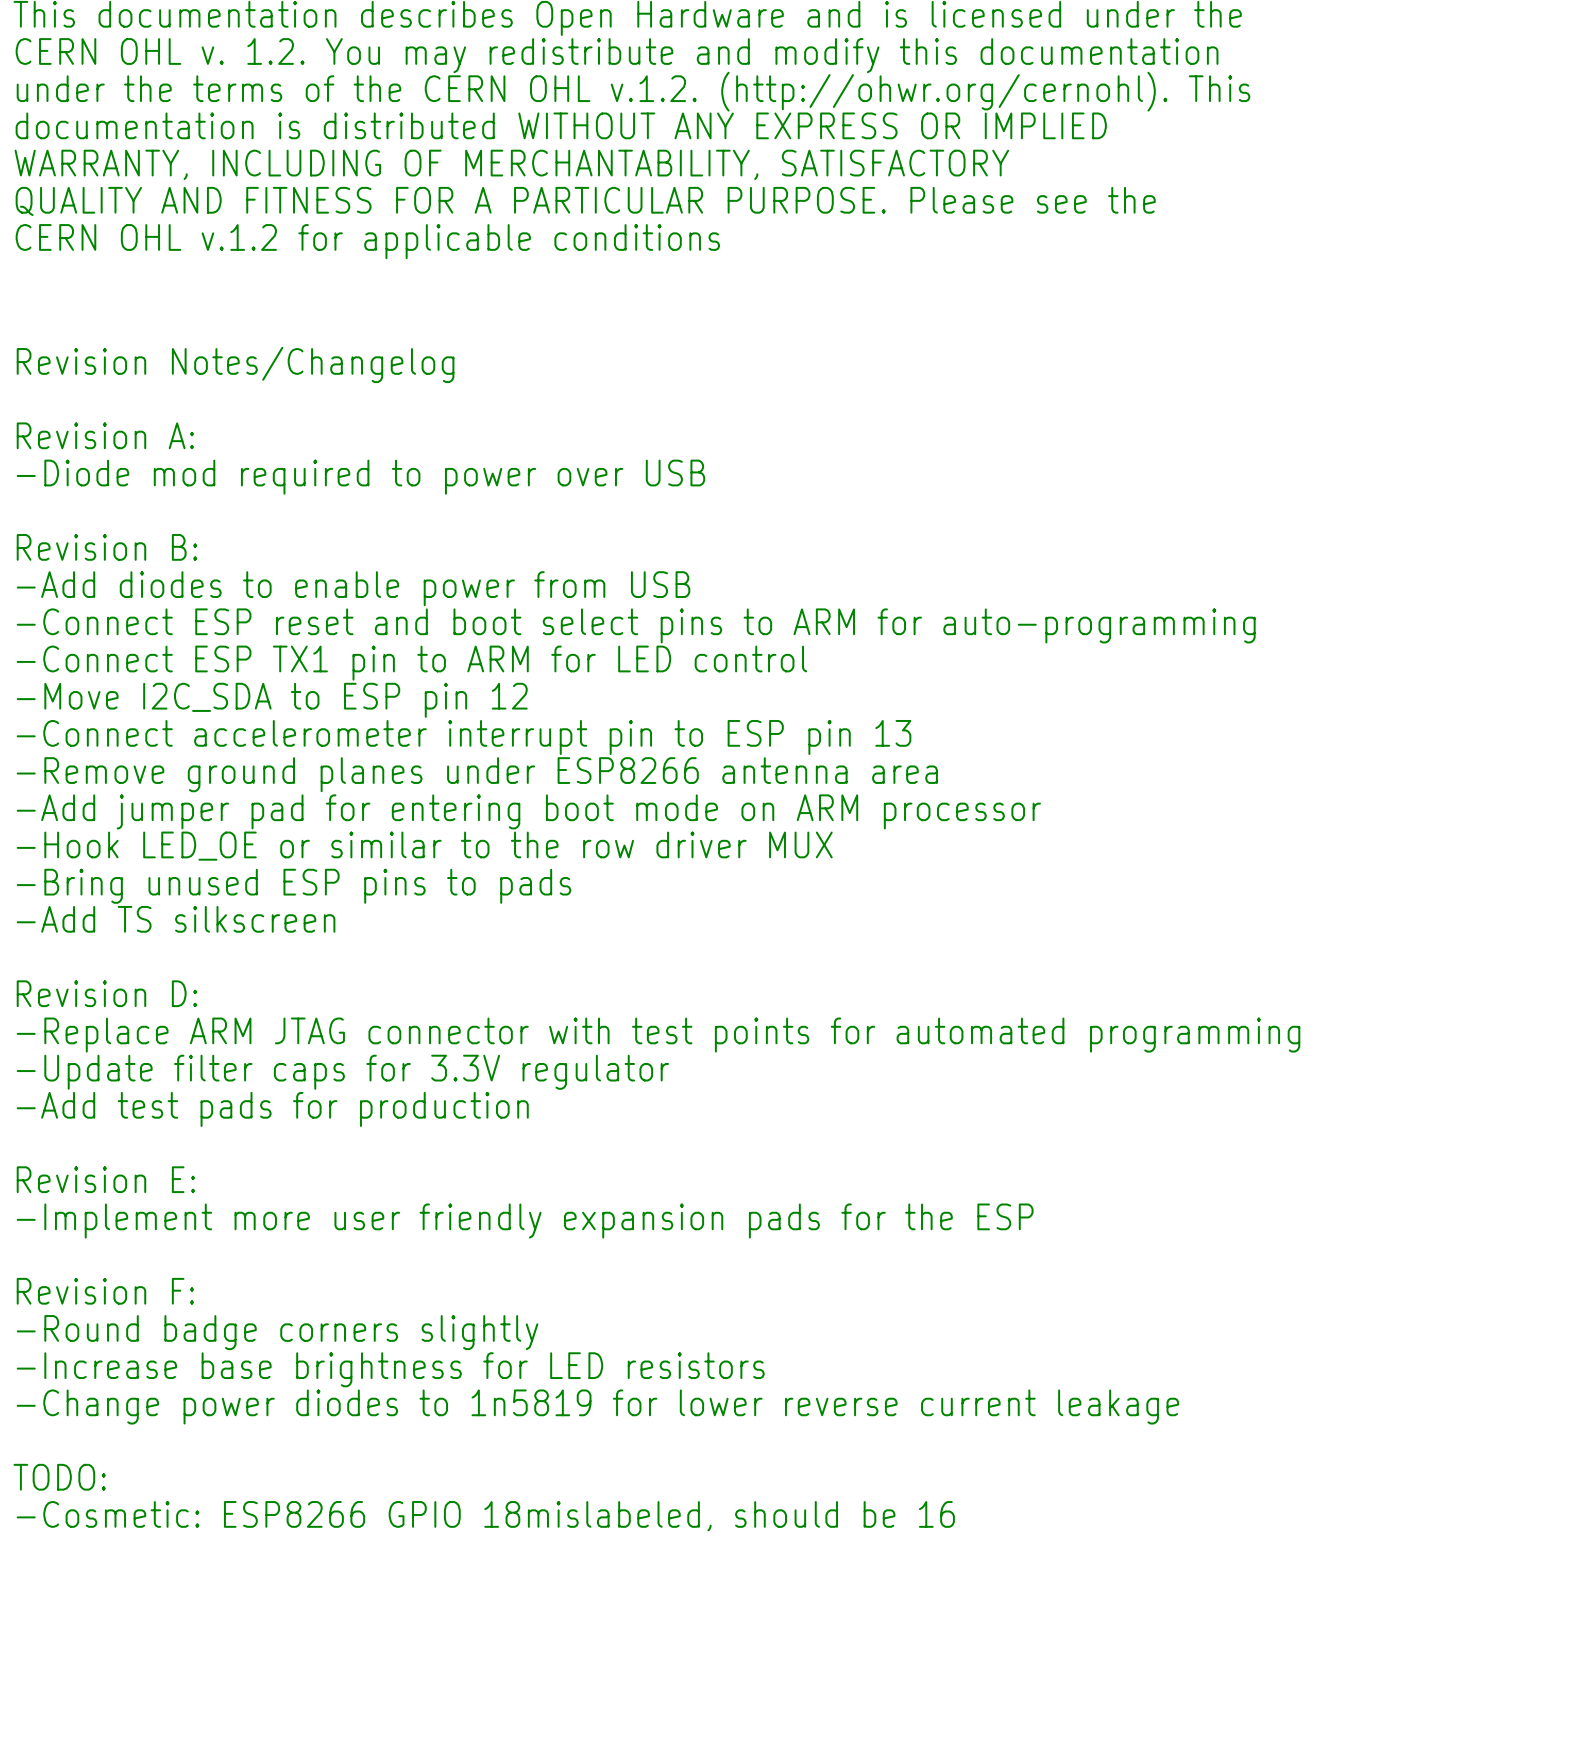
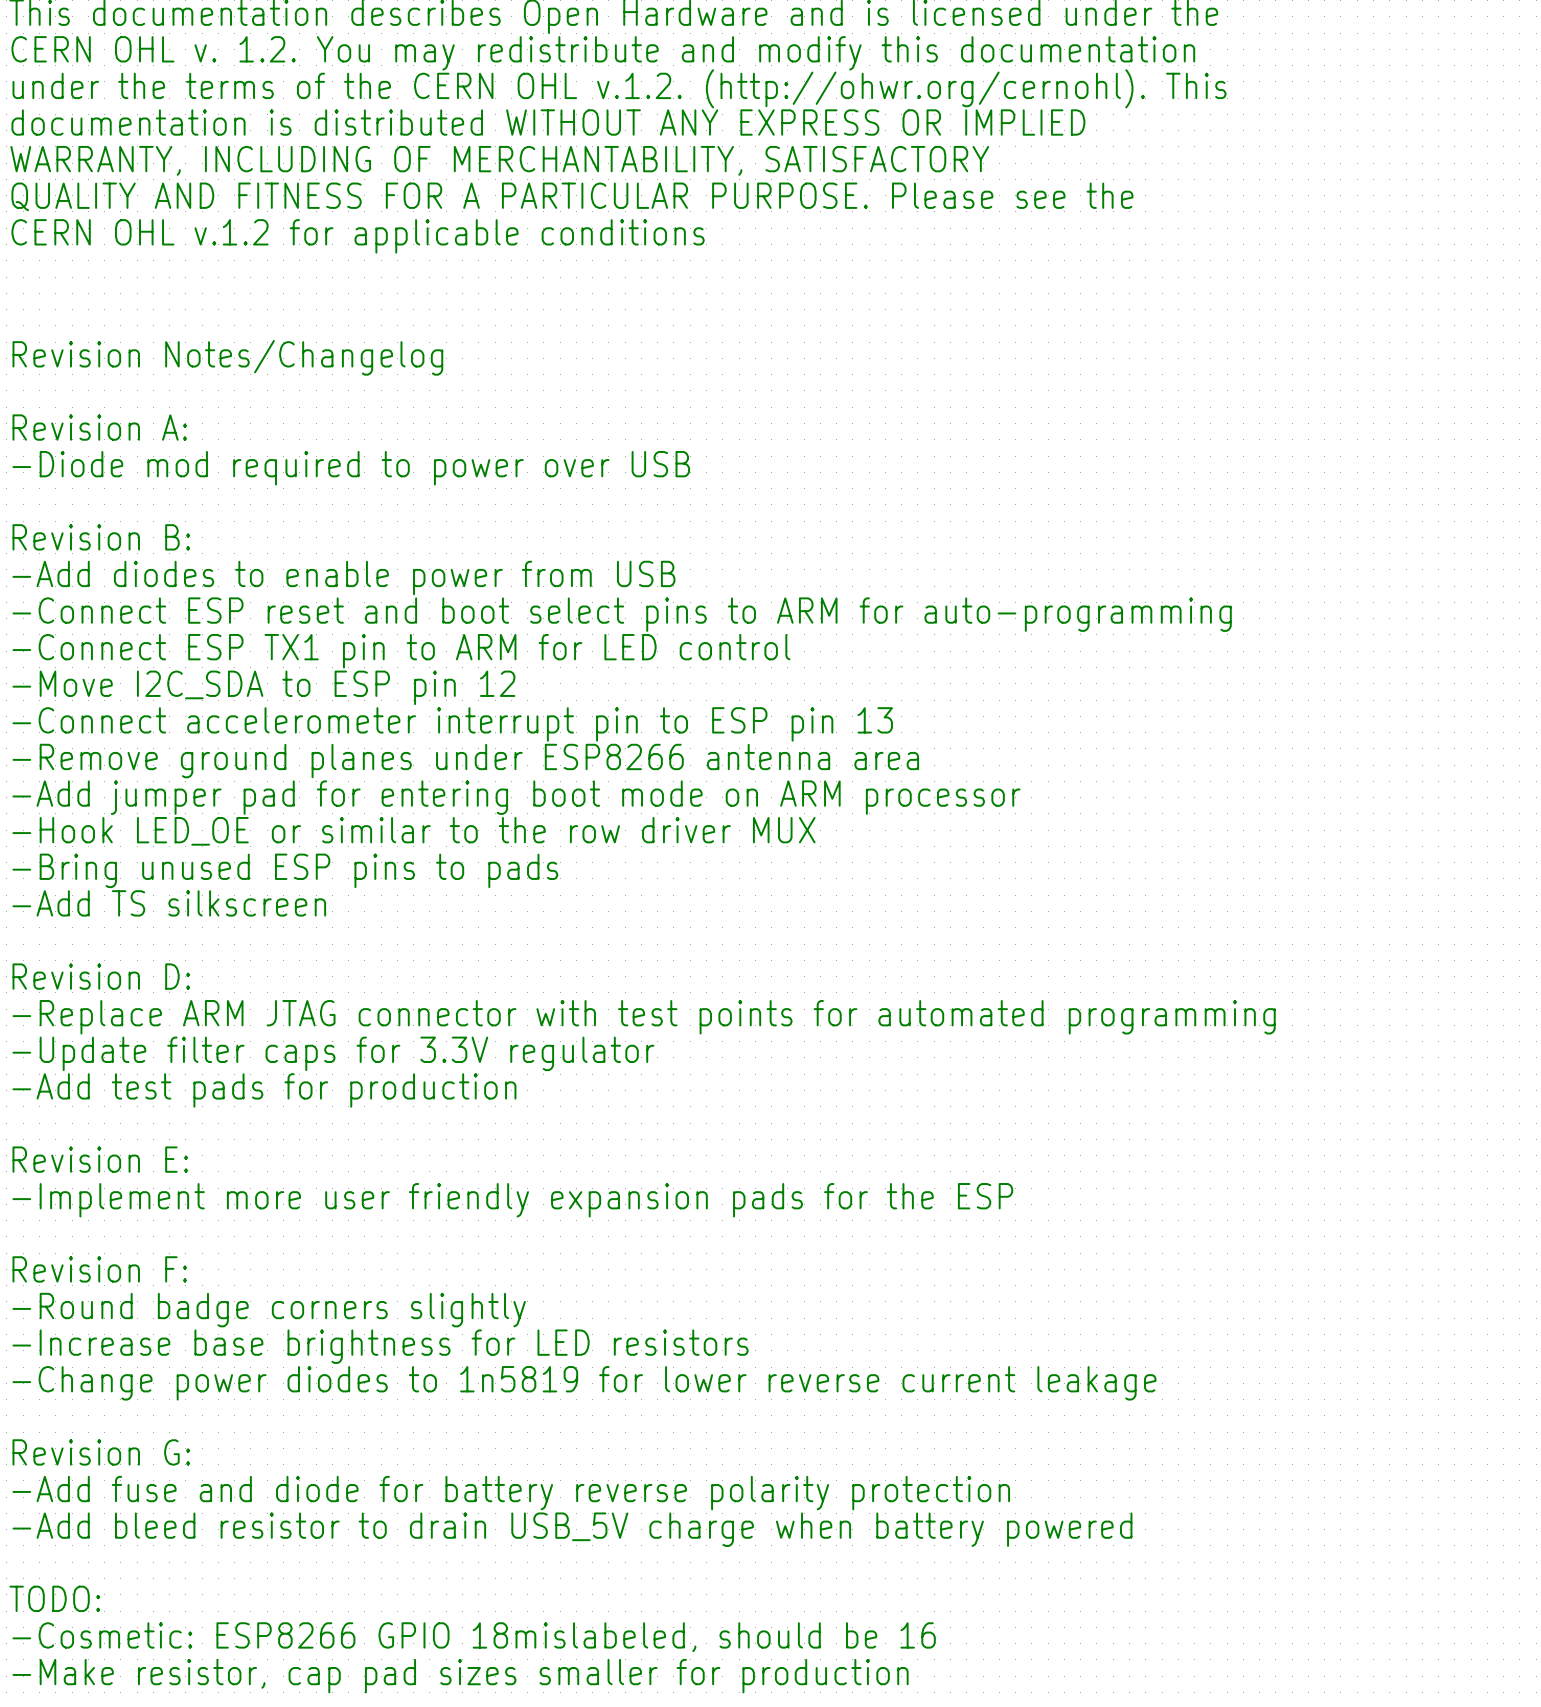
text: TODO: (59, 1477) -> Revision G: (101, 1452)
text: -Cosmetic: ESP8266 GPIO 18mislabeled, should be 16 (485, 1516) -> -Add fuse and diode for battery reverse polarity protection (511, 1493)
text: none -> -Add bleed resistor to drain USB_5V charge when battery powered (572, 1529)
text: none -> TODO: (54, 1598)
text: none -> -Cosmetic: ESP8266 GPIO 18mislabeled, should be 16 (474, 1637)
text: none -> -Make resistor, cap pad sizes smaller for production (460, 1676)

